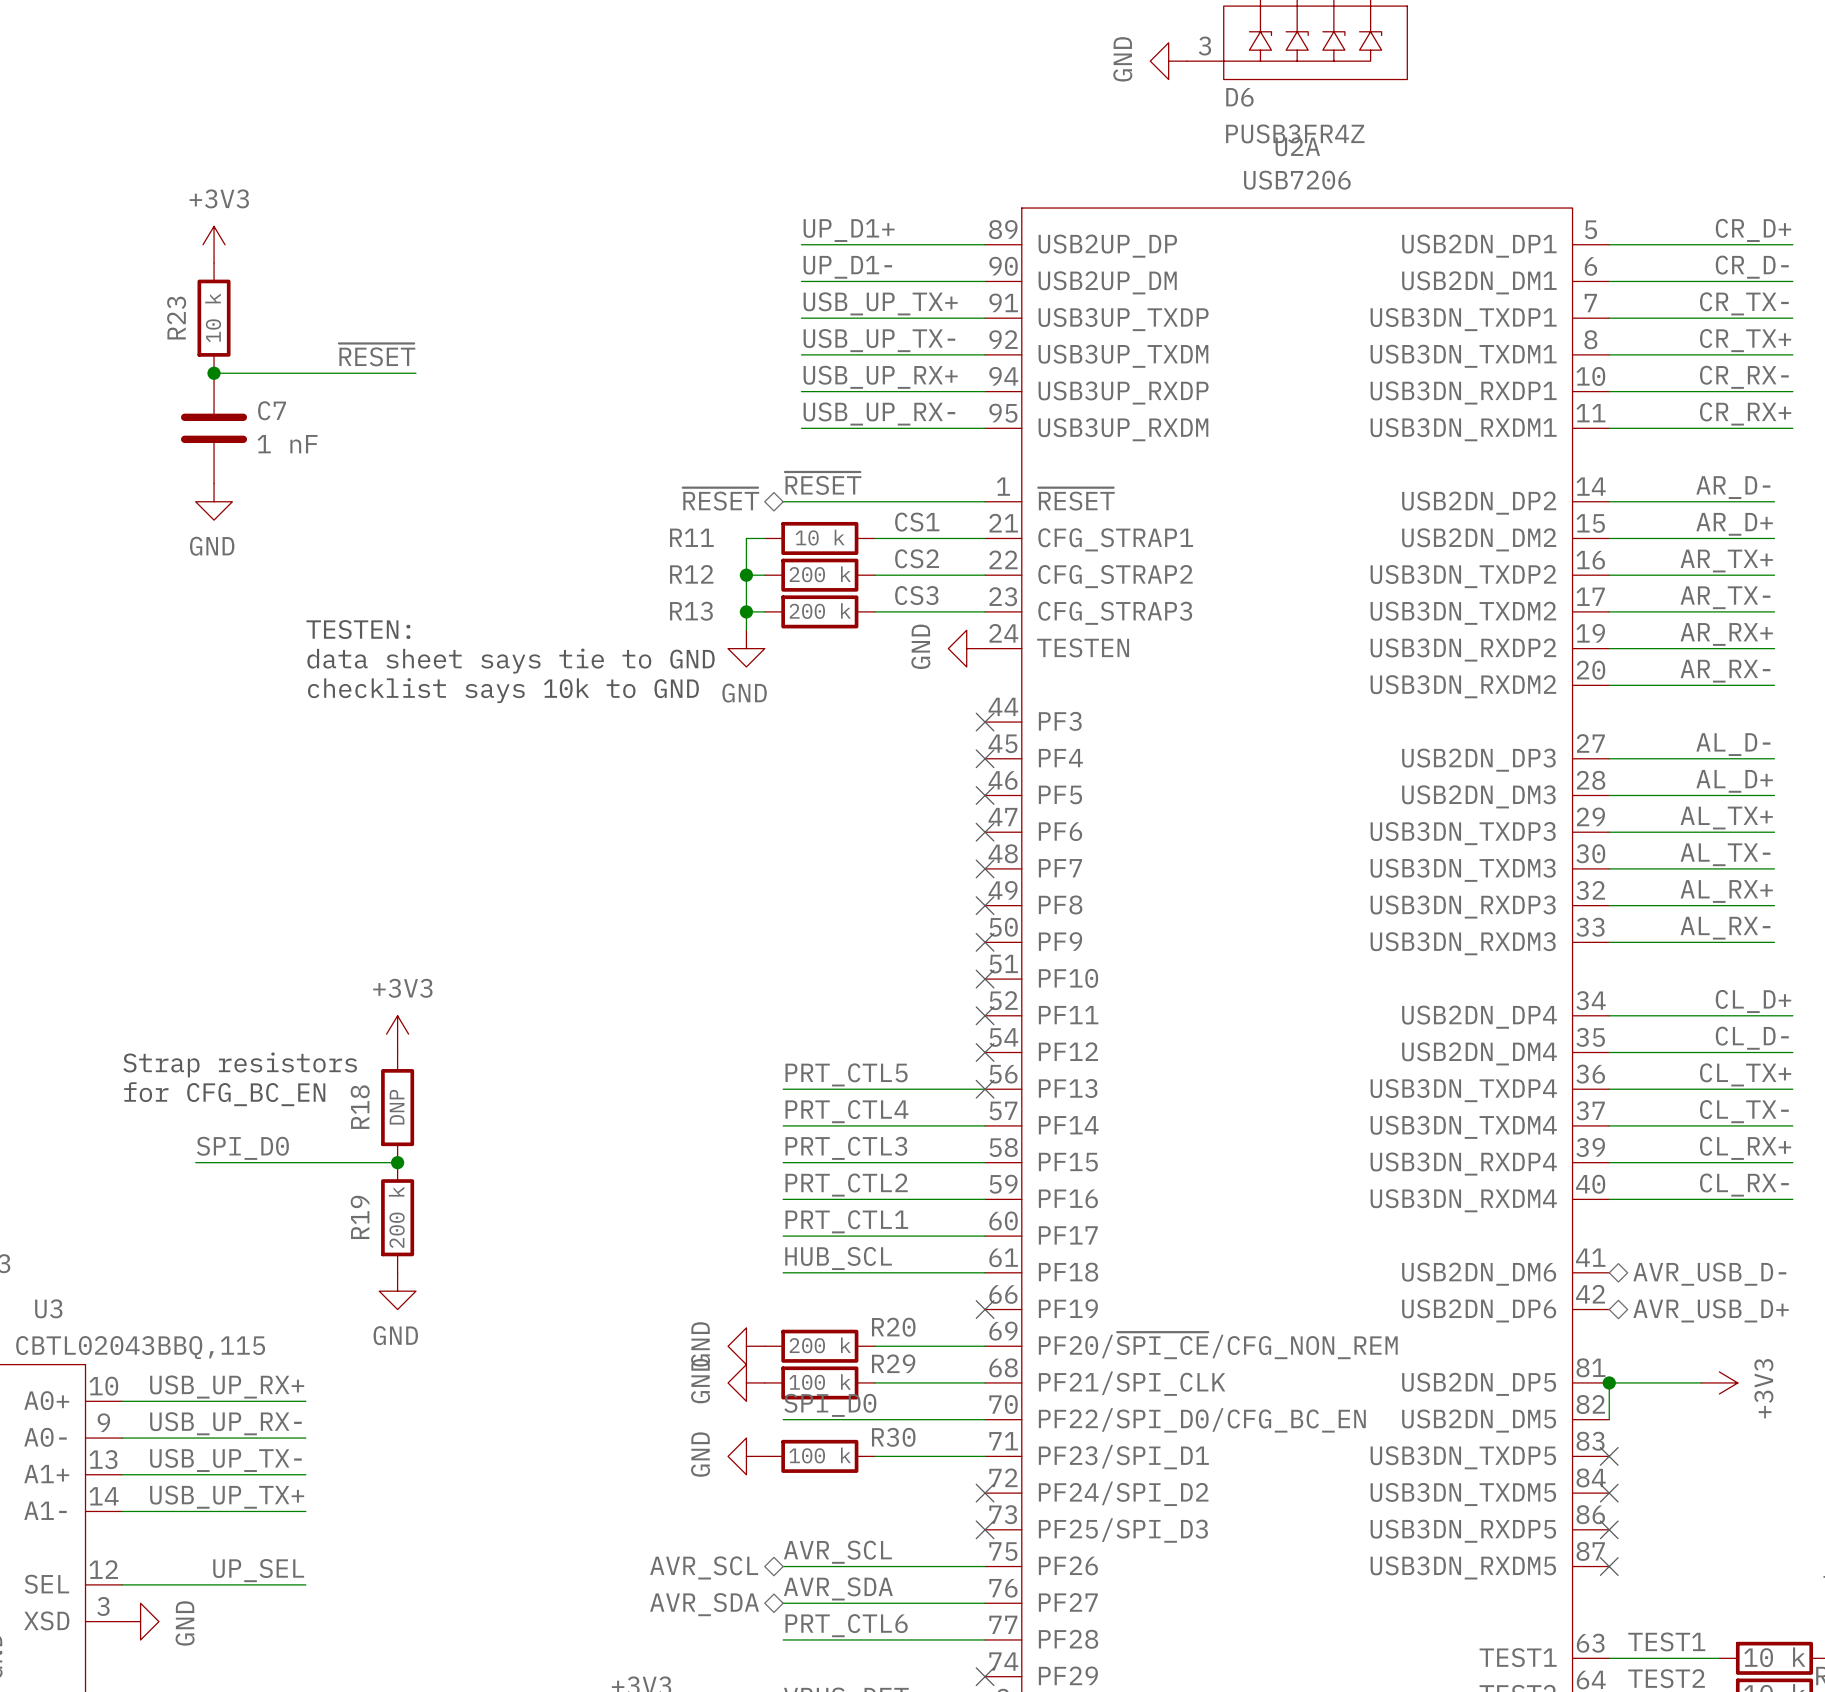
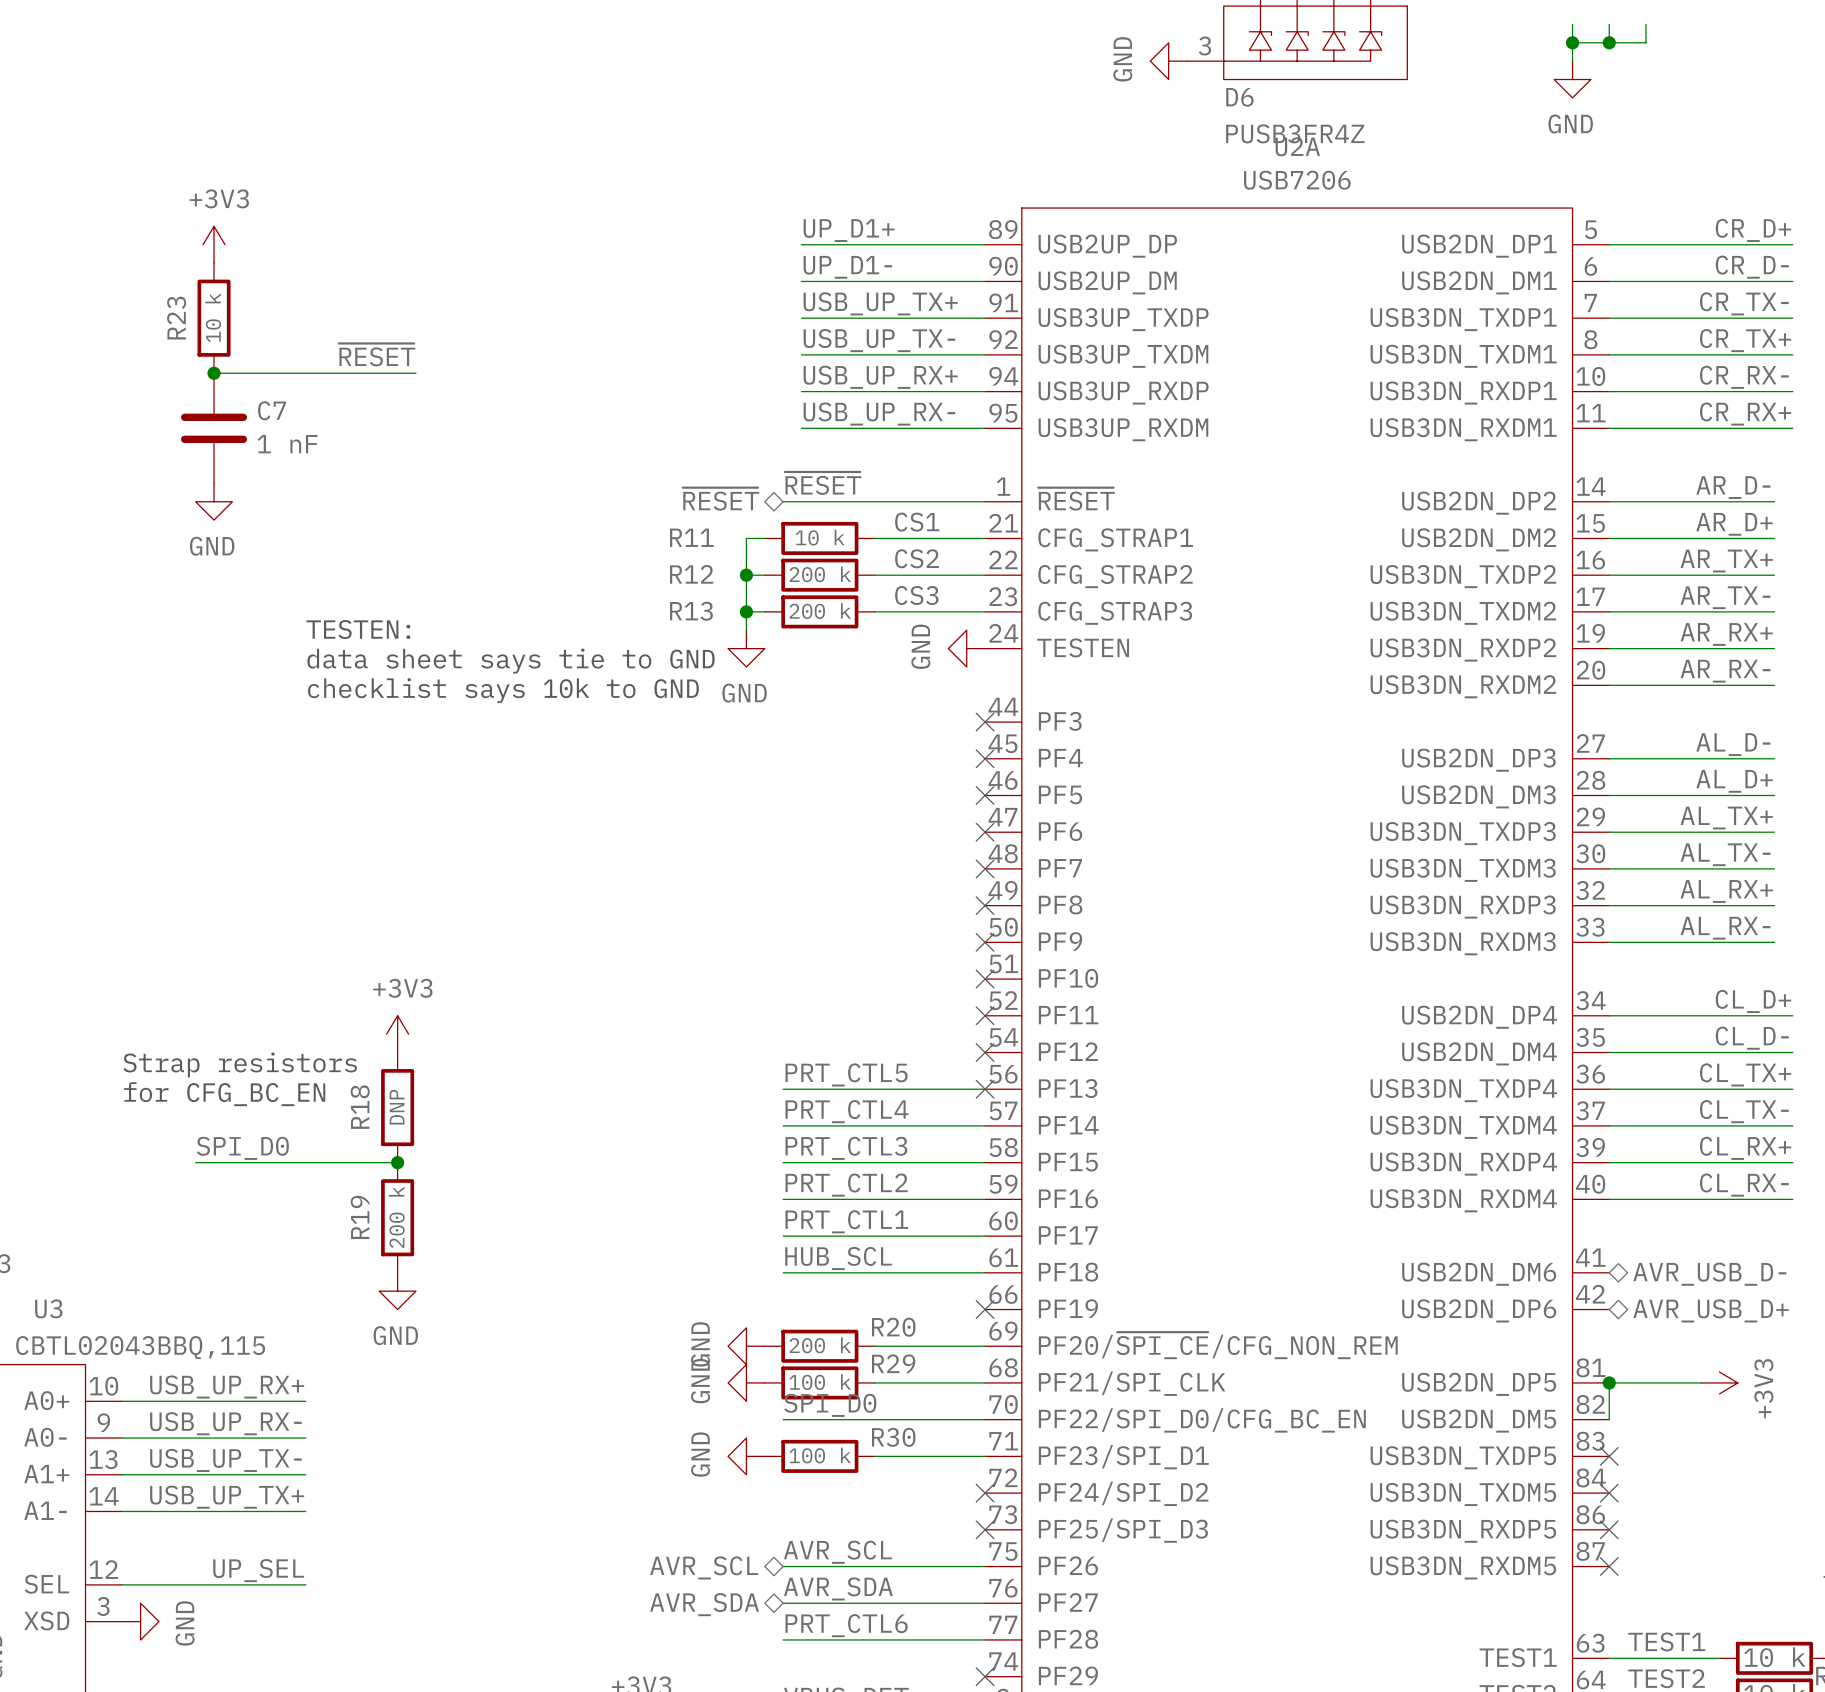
wire: none -> (1572, 24) (1572, 61)
wire: none -> (1609, 24) (1609, 42)
wire: none -> (1645, 24) (1645, 42) (1572, 42)
junction: none -> (1572, 42)
junction: none -> (1609, 42)
power symbol: none -> GND (1572, 79)

